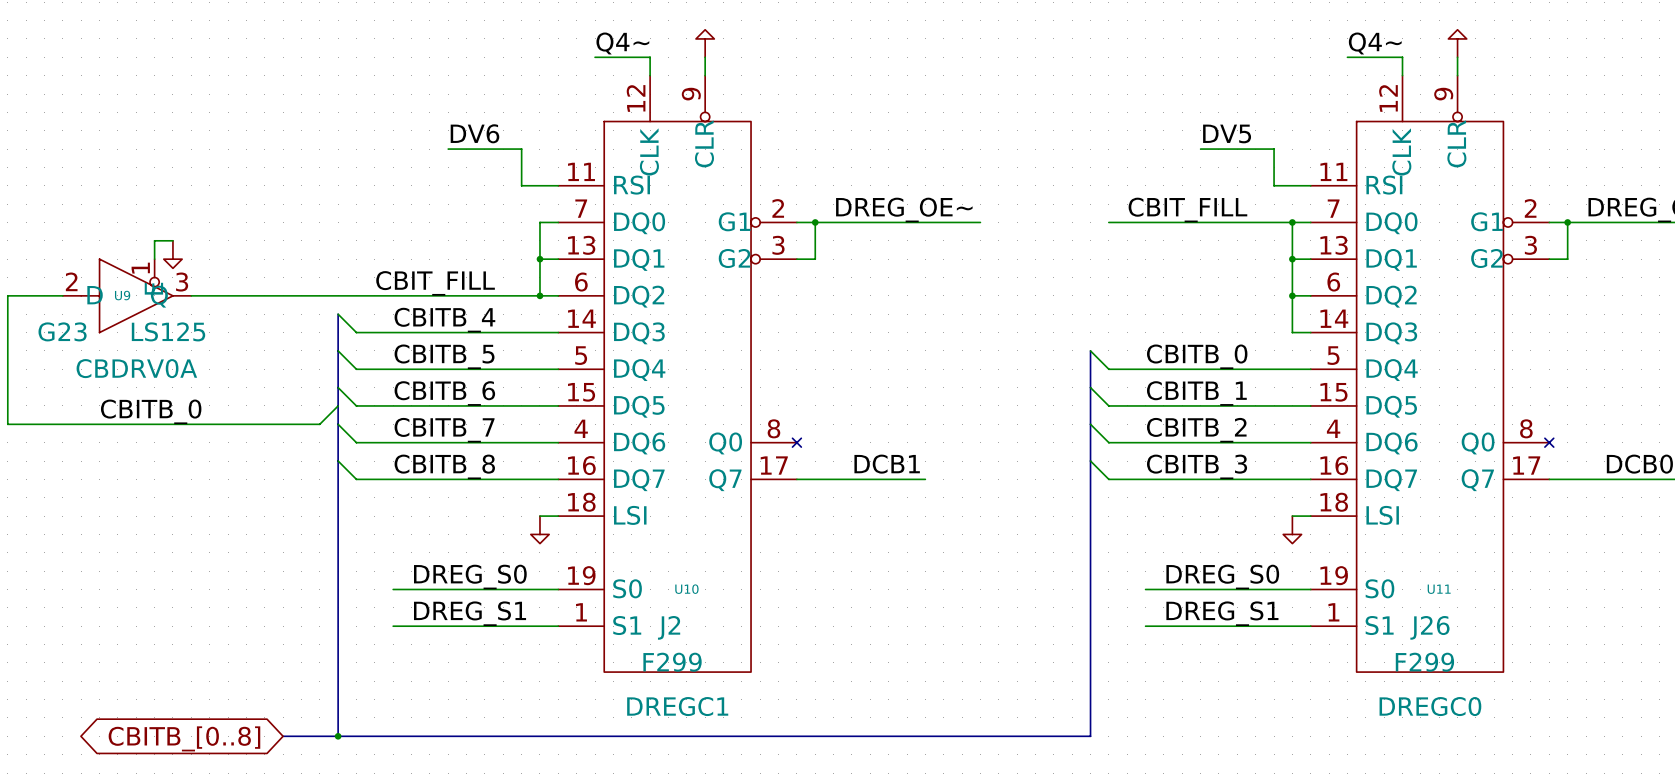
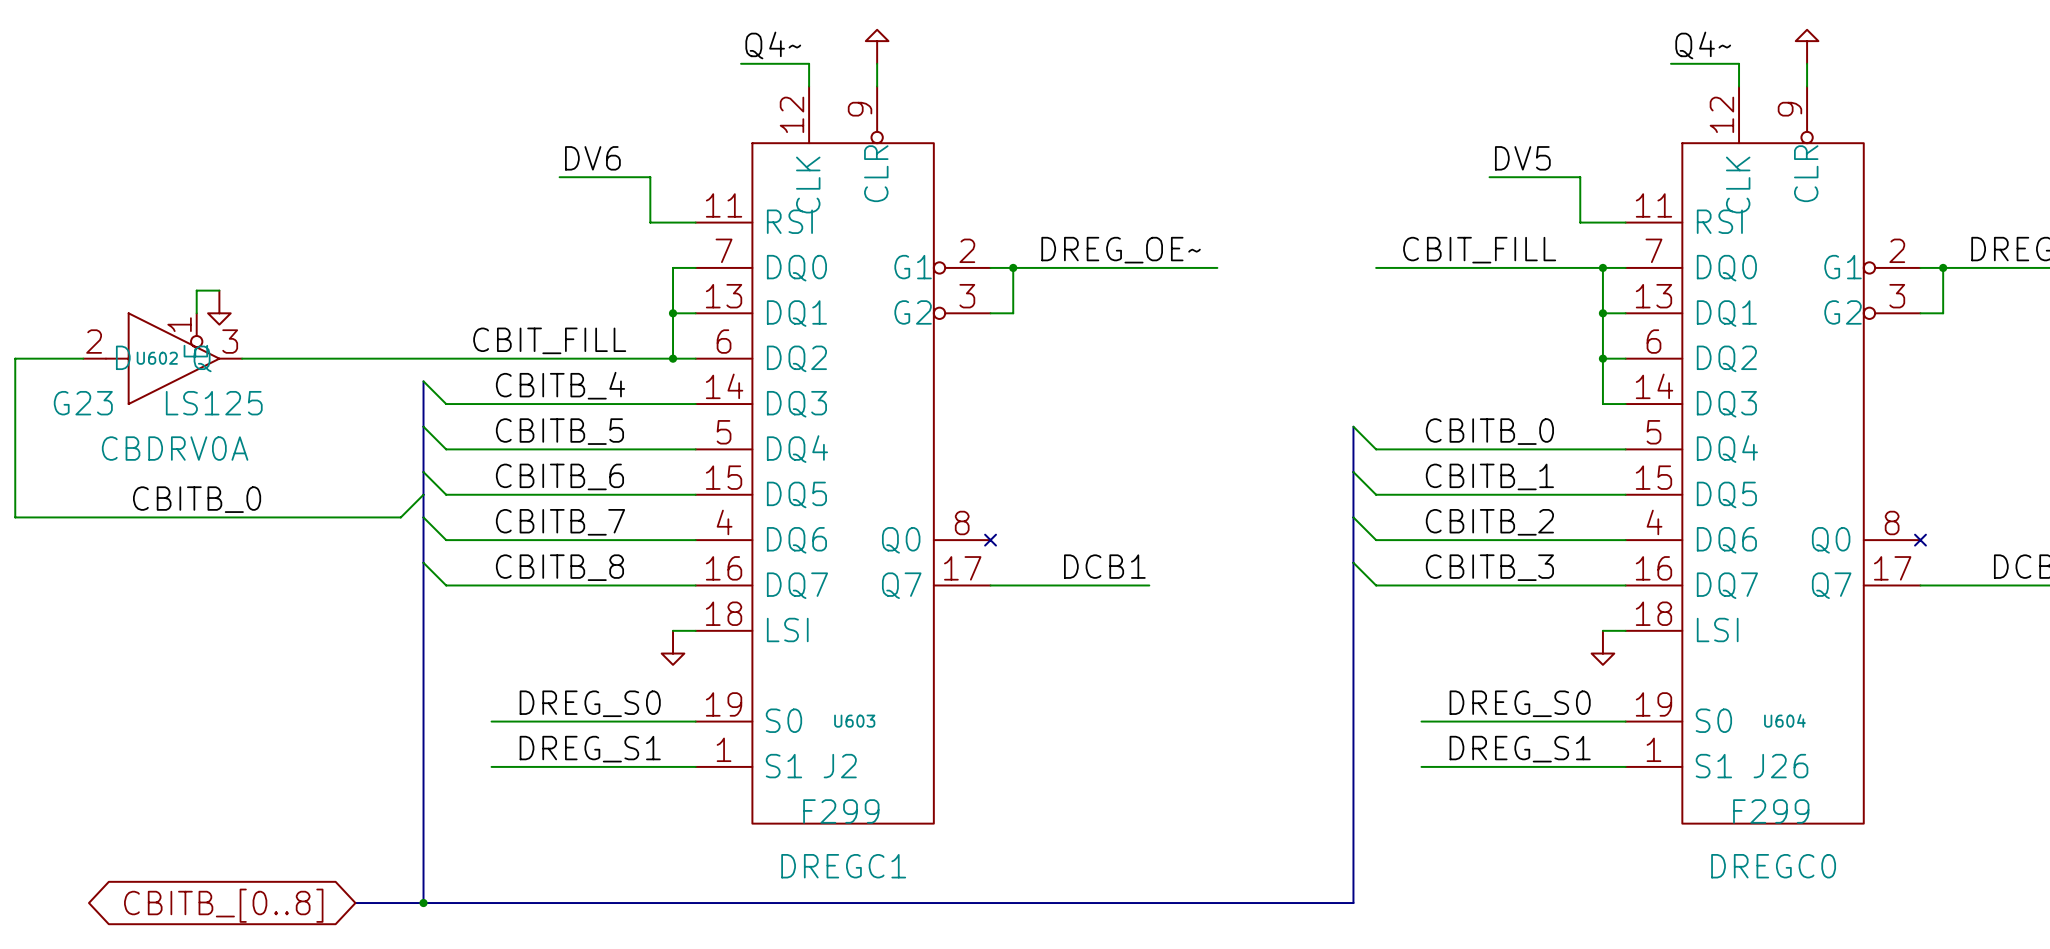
U9 name: U9 (122, 295) -> U602 (157, 358)
U10 name: U10 (686, 589) -> U603 (854, 721)
U11 name: U11 (1439, 589) -> U604 (1784, 720)

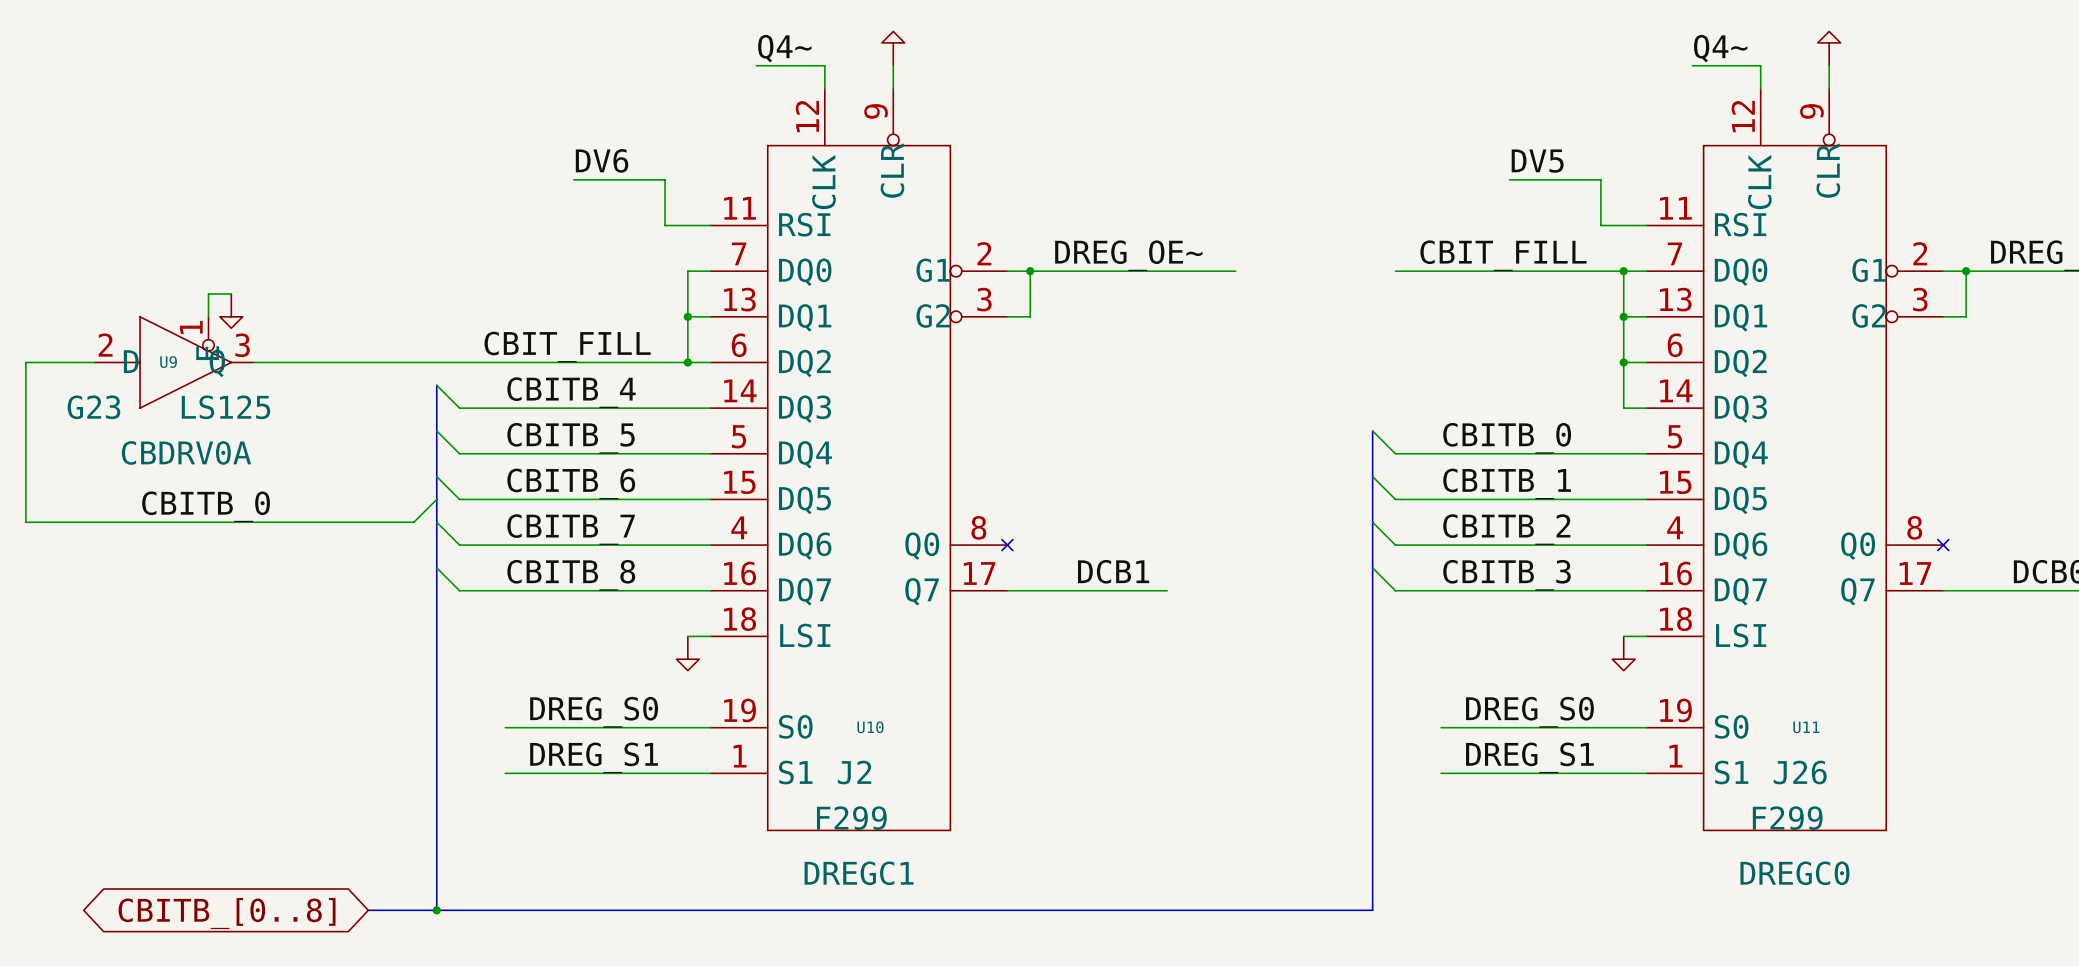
U602 name: U602 (157, 358) -> U9 (168, 362)
U604 name: U604 (1784, 720) -> U11 (1806, 727)
U603 name: U603 (854, 721) -> U10 (870, 727)

